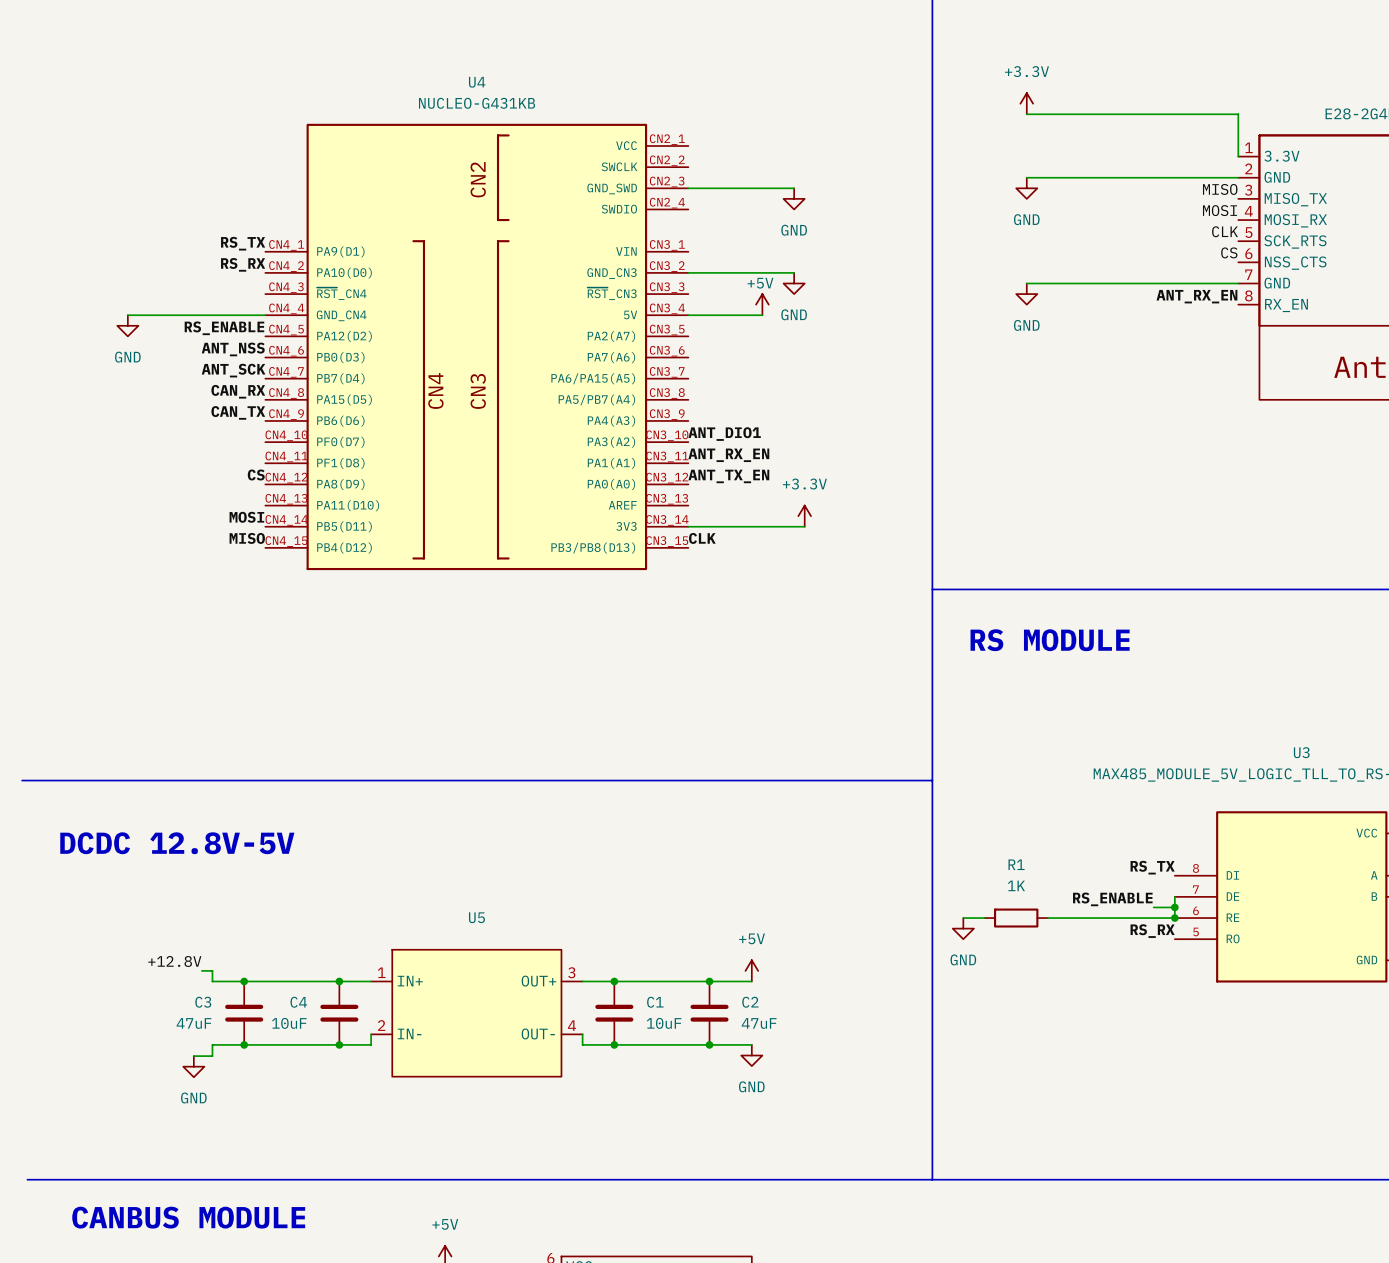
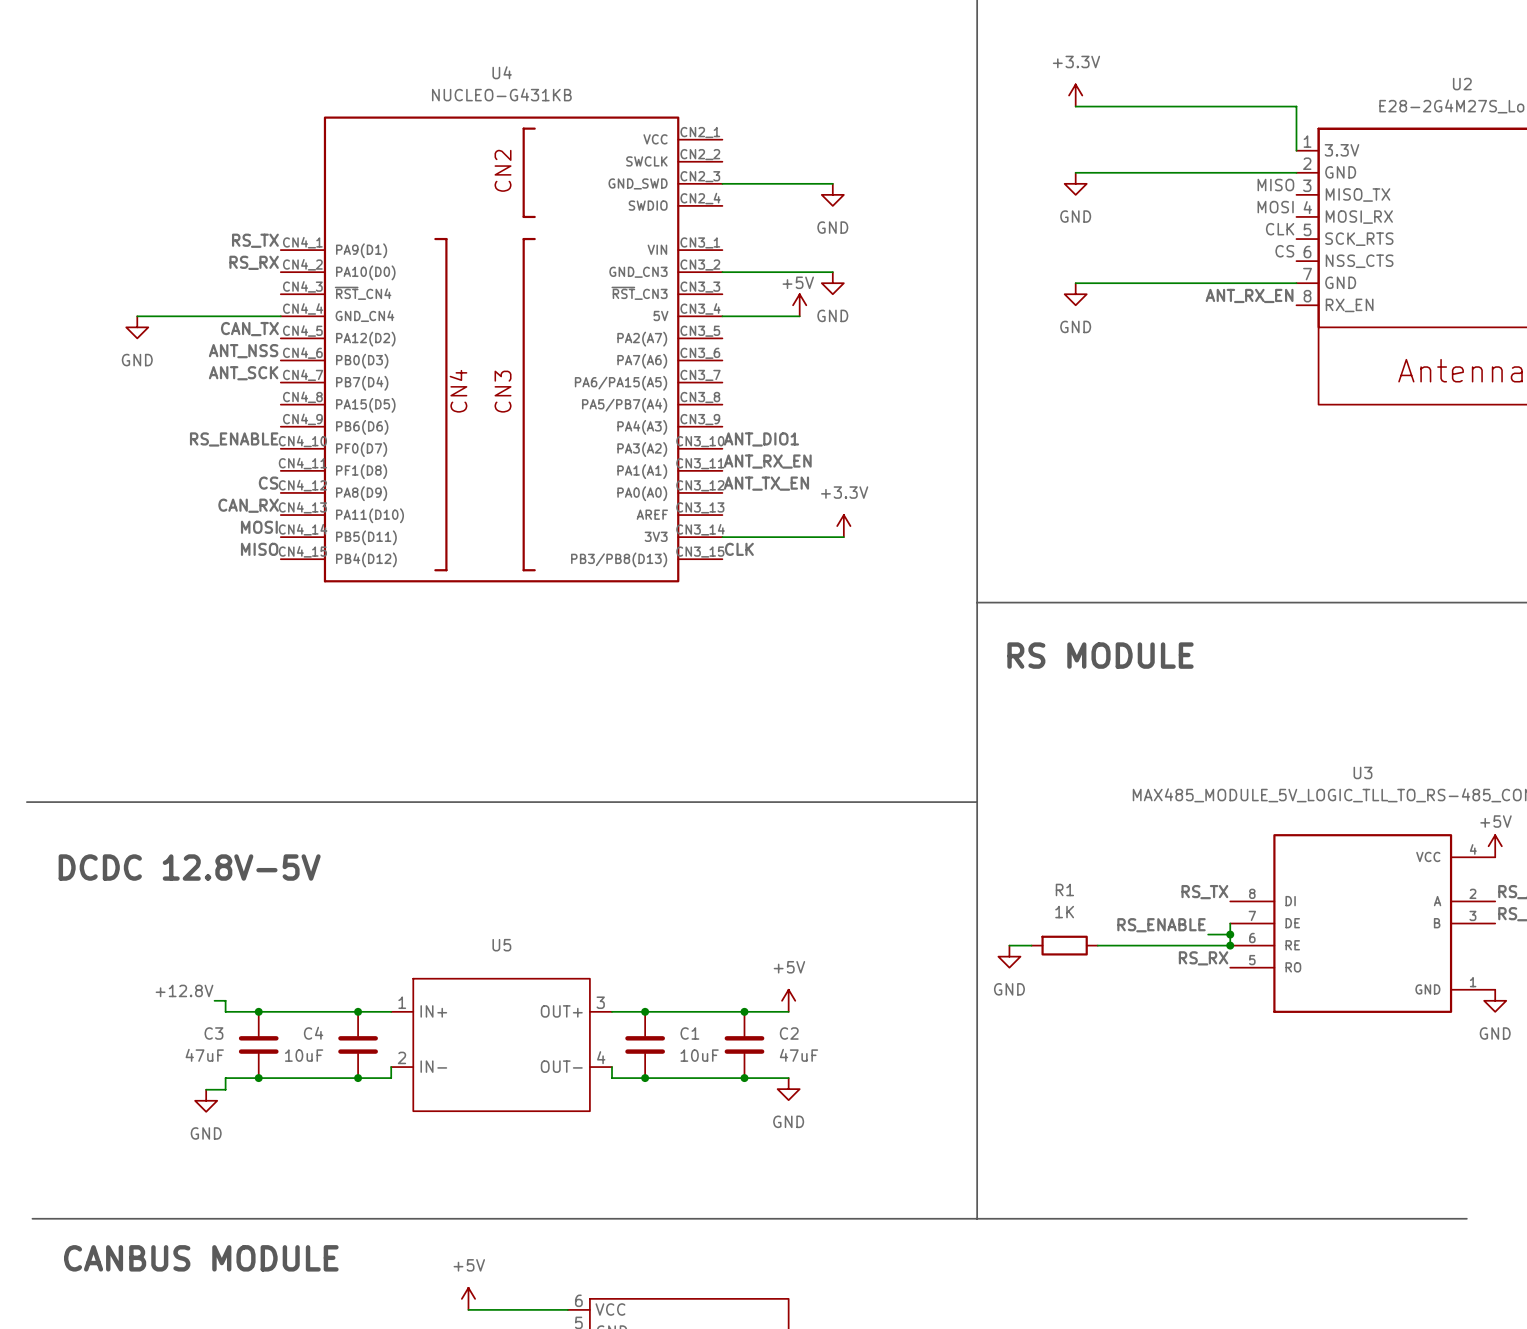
label: RS_ENABLE (224, 328) -> CAN_TX (249, 329)
label position: CAN_RX (238, 391) -> CAN_RX (248, 505)
label: CAN_TX (238, 412) -> none
label: none -> RS_ENABLE (234, 439)

